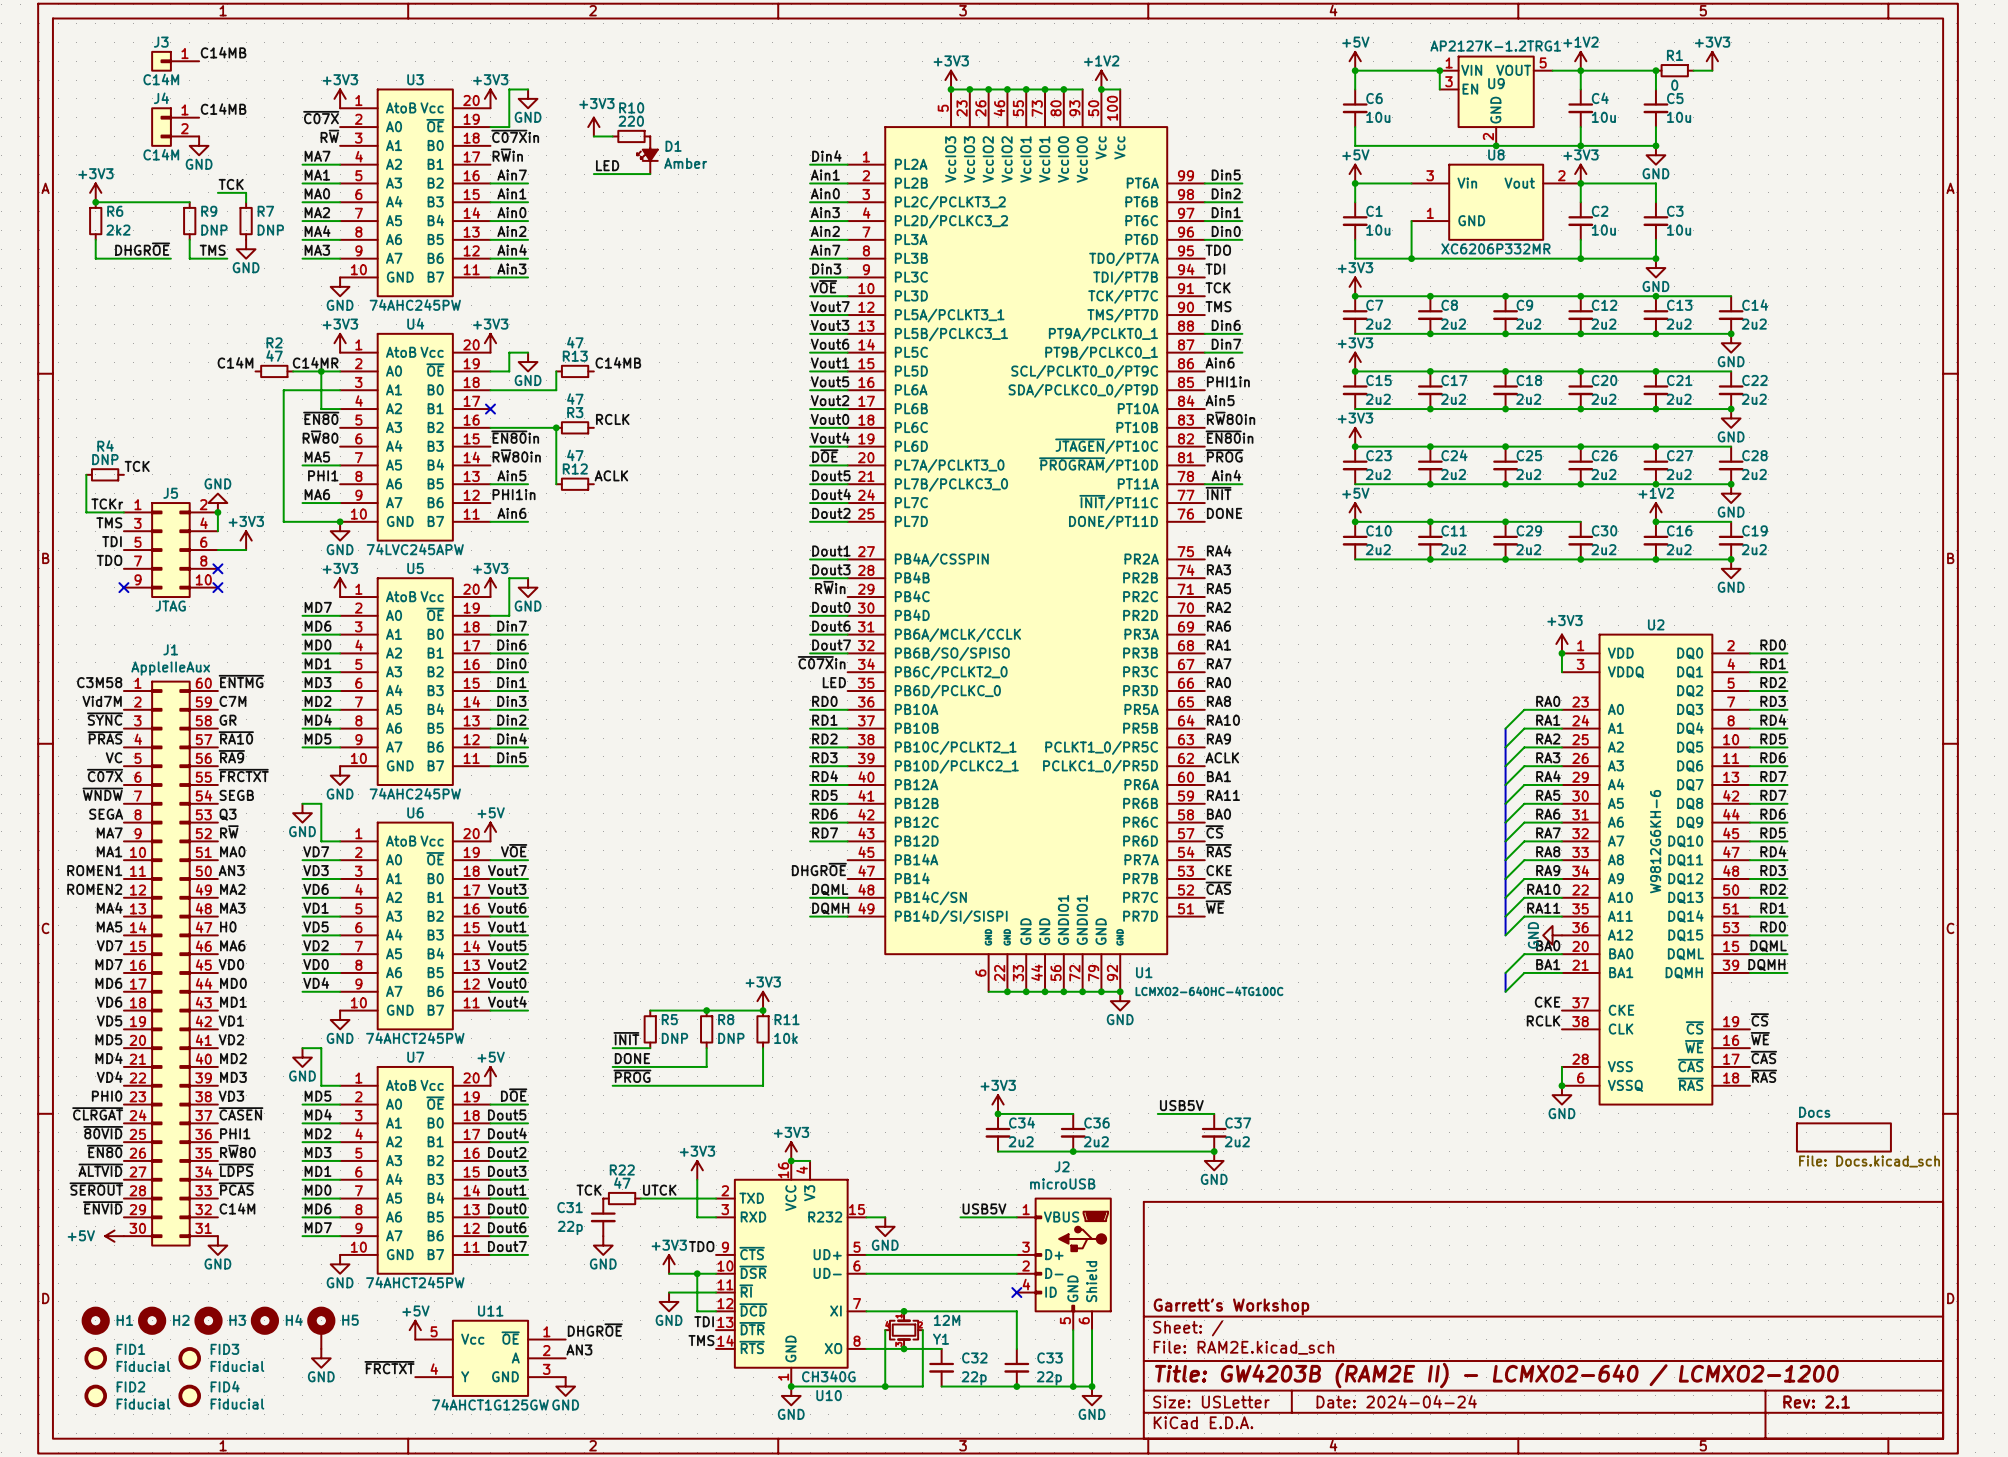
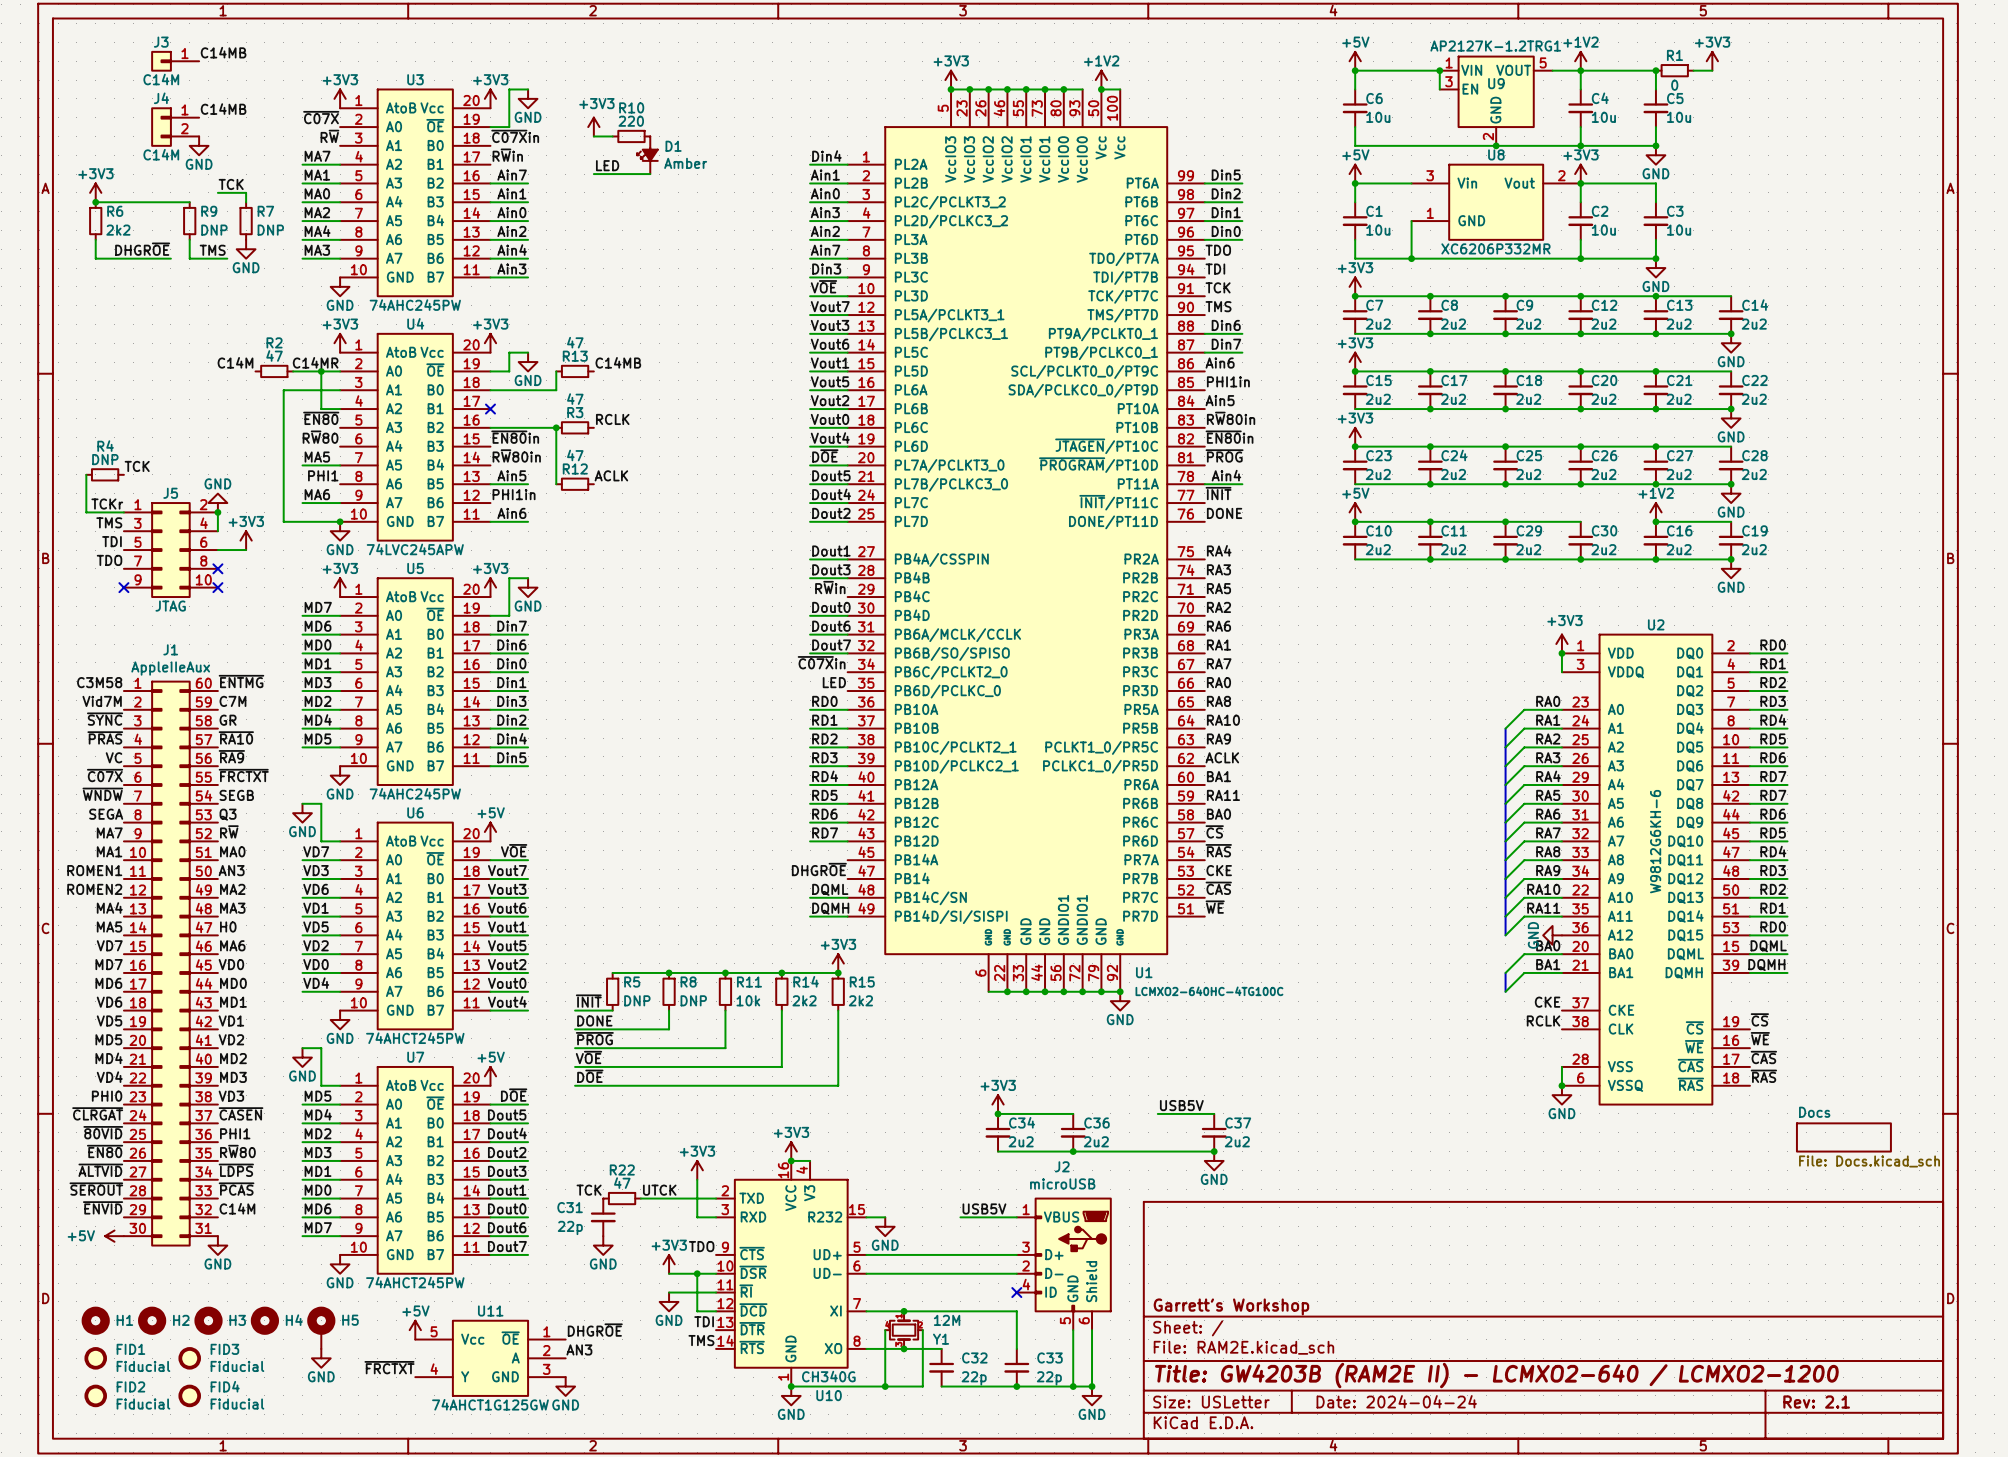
wire: none -> (612, 972) (838, 972)
junction: none -> (669, 972)
junction: none -> (725, 972)
junction: none -> (781, 972)
junction: none -> (838, 972)
R14: none -> 2k2 (781, 991)
R15: none -> 2k2 (838, 991)
power symbol position: +3V3 (763, 1001) -> +3V3 (838, 963)
wire: none -> (575, 1010) (612, 1010)
wire: (650, 1010) (763, 1010) -> none
wire: none -> (669, 1010) (669, 1029) (575, 1029)
junction: (706, 1010) -> none
wire: none -> (725, 1010) (725, 1048) (650, 1048)
junction: (763, 1010) -> none
R5 position: (650, 1029) -> (612, 991)
R8 position: (706, 1029) -> (669, 991)
R11 position: (763, 1029) -> (725, 991)
label position: ~{INIT} (626, 1038) -> ~{INIT} (588, 1001)
wire: none -> (575, 1048) (612, 1048)
wire: (706, 1048) (706, 1066) -> (781, 1010) (781, 1066) (706, 1066)
wire: (763, 1048) (763, 1085) -> (838, 1010) (838, 1085) (763, 1085)
label: none -> V~{OE} (588, 1057)
label position: DONE (632, 1058) -> DONE (594, 1020)
wire: none -> (575, 1066) (612, 1066)
label: none -> D~{OE} (590, 1076)
label position: ~{PROG} (632, 1076) -> ~{PROG} (594, 1038)
wire: none -> (575, 1085) (612, 1085)

